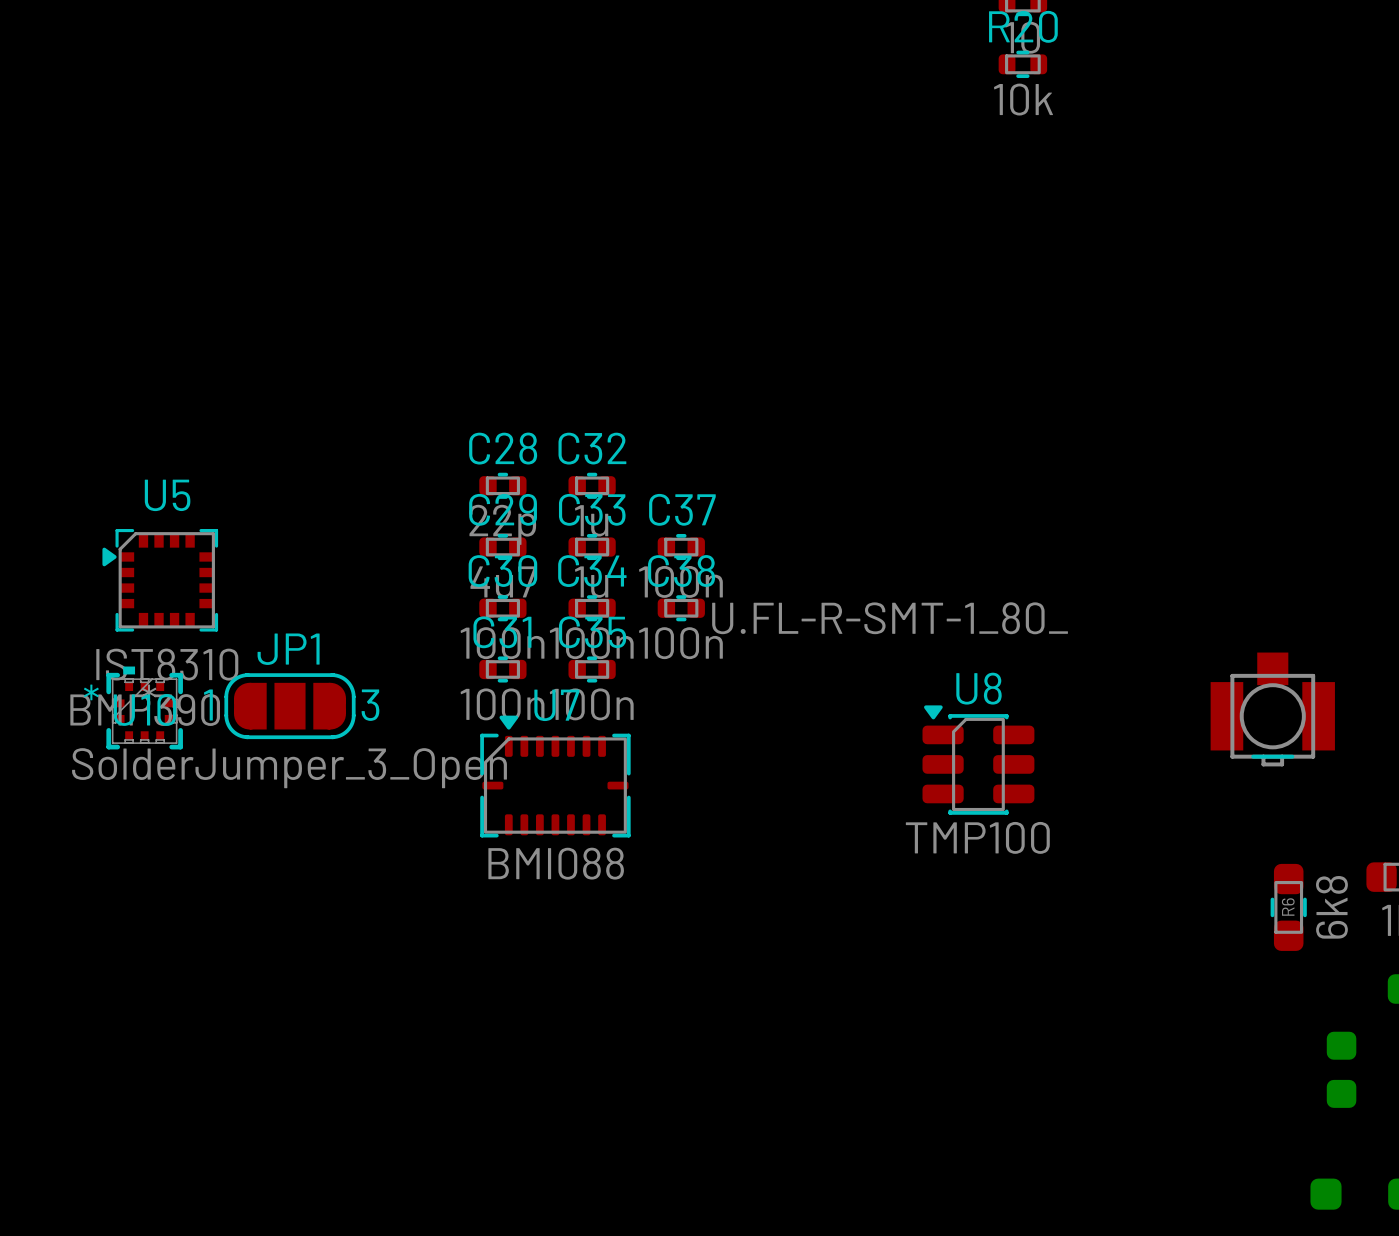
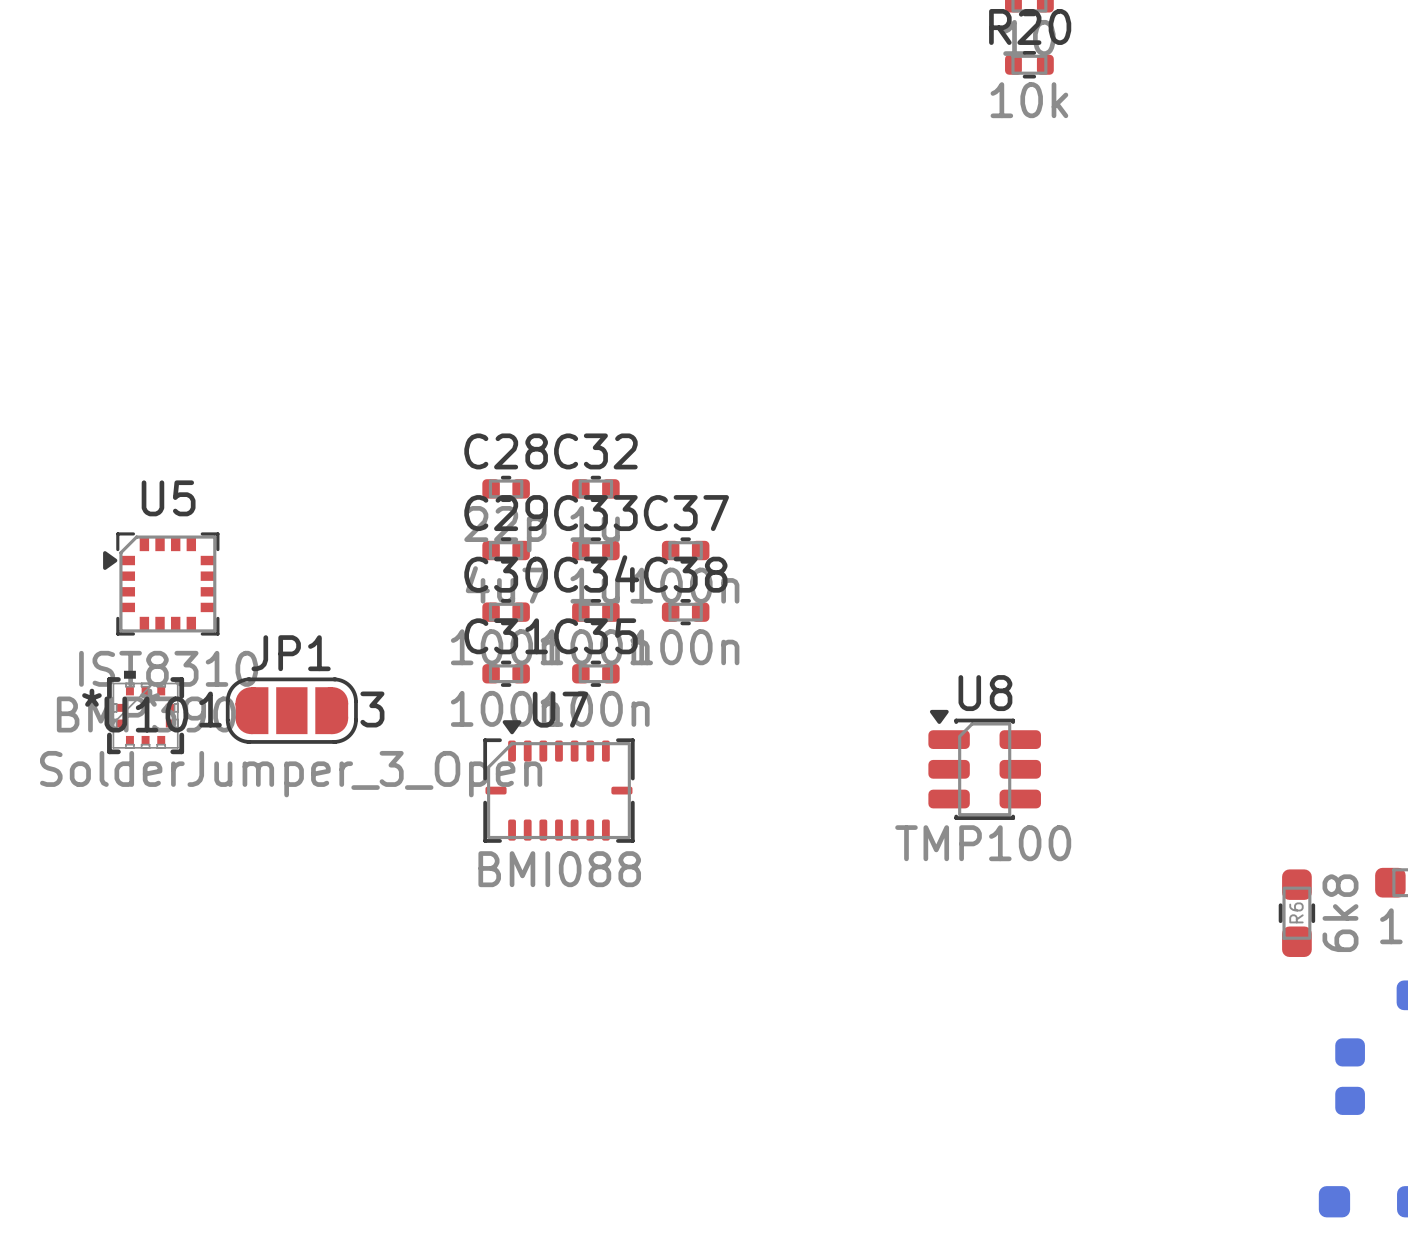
part: U.FL-R-SMT-1_80_ (1272, 709) -> none

